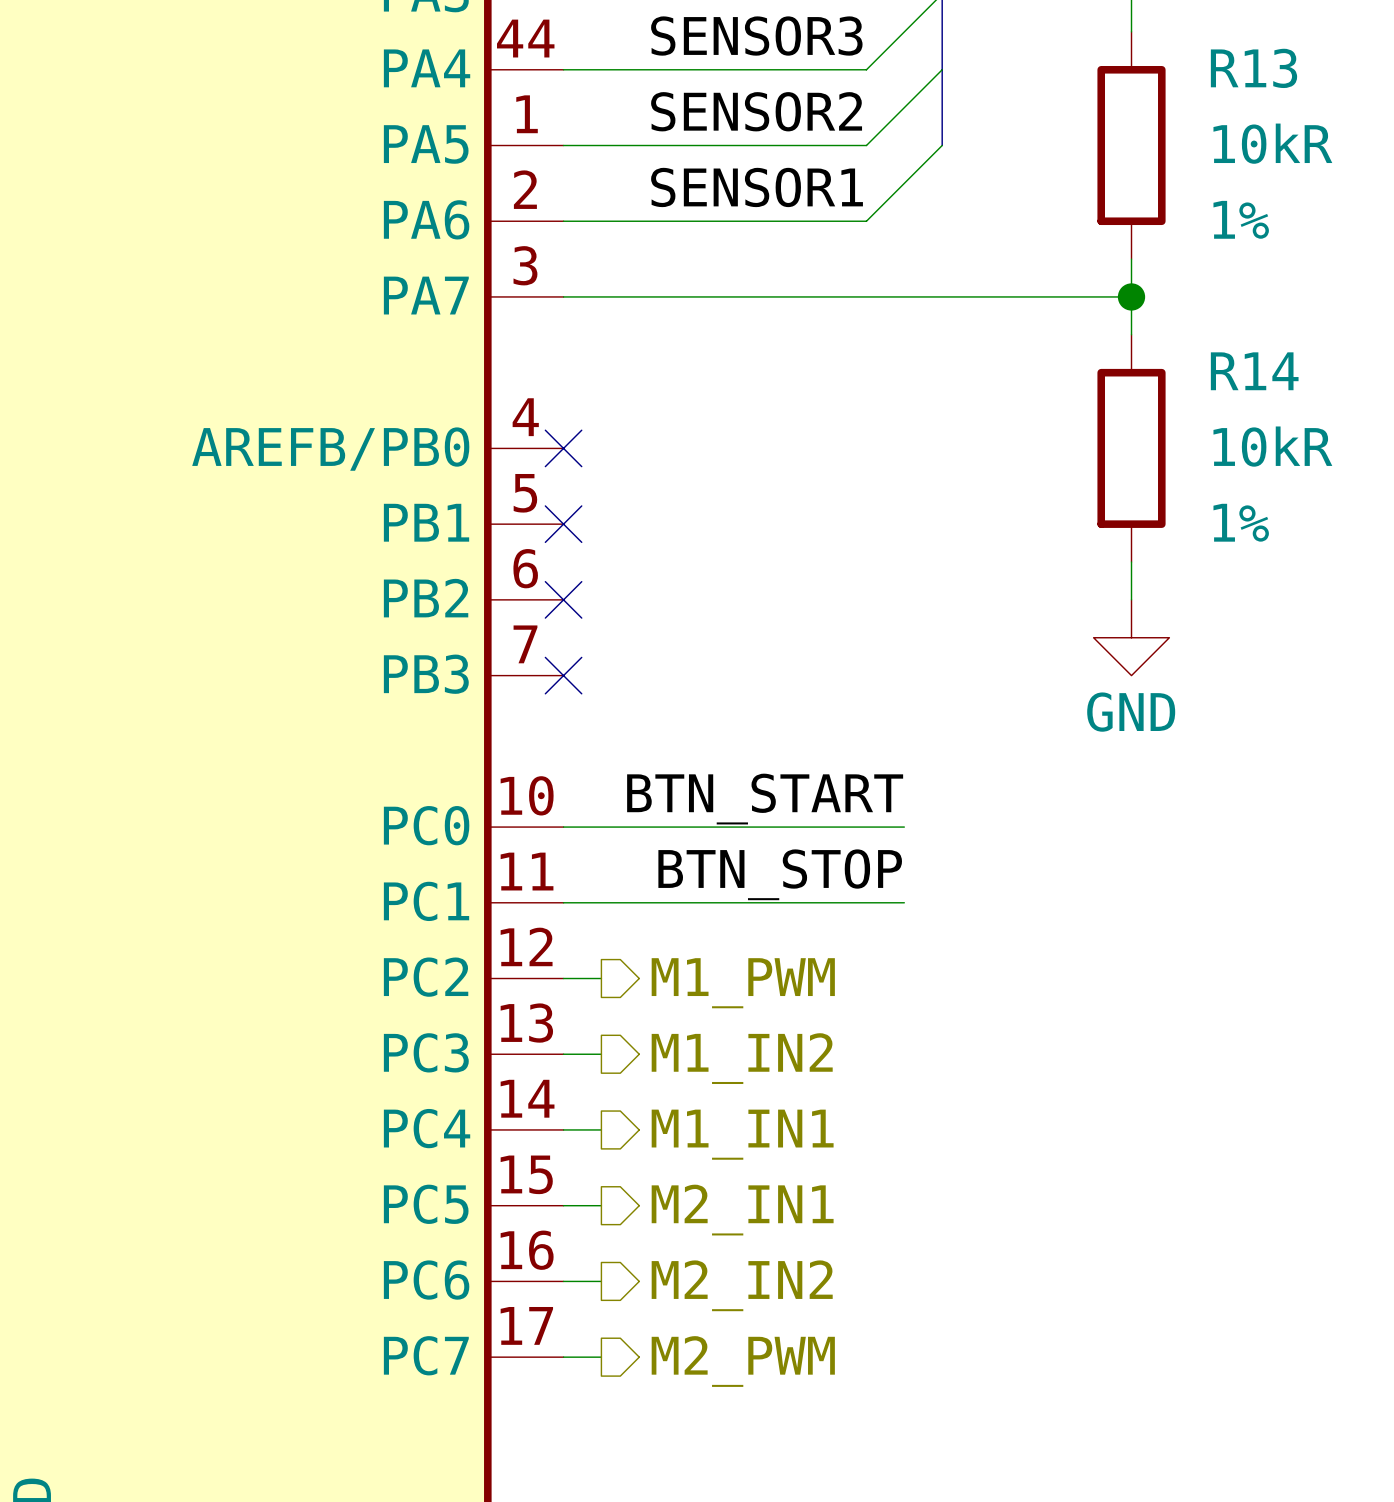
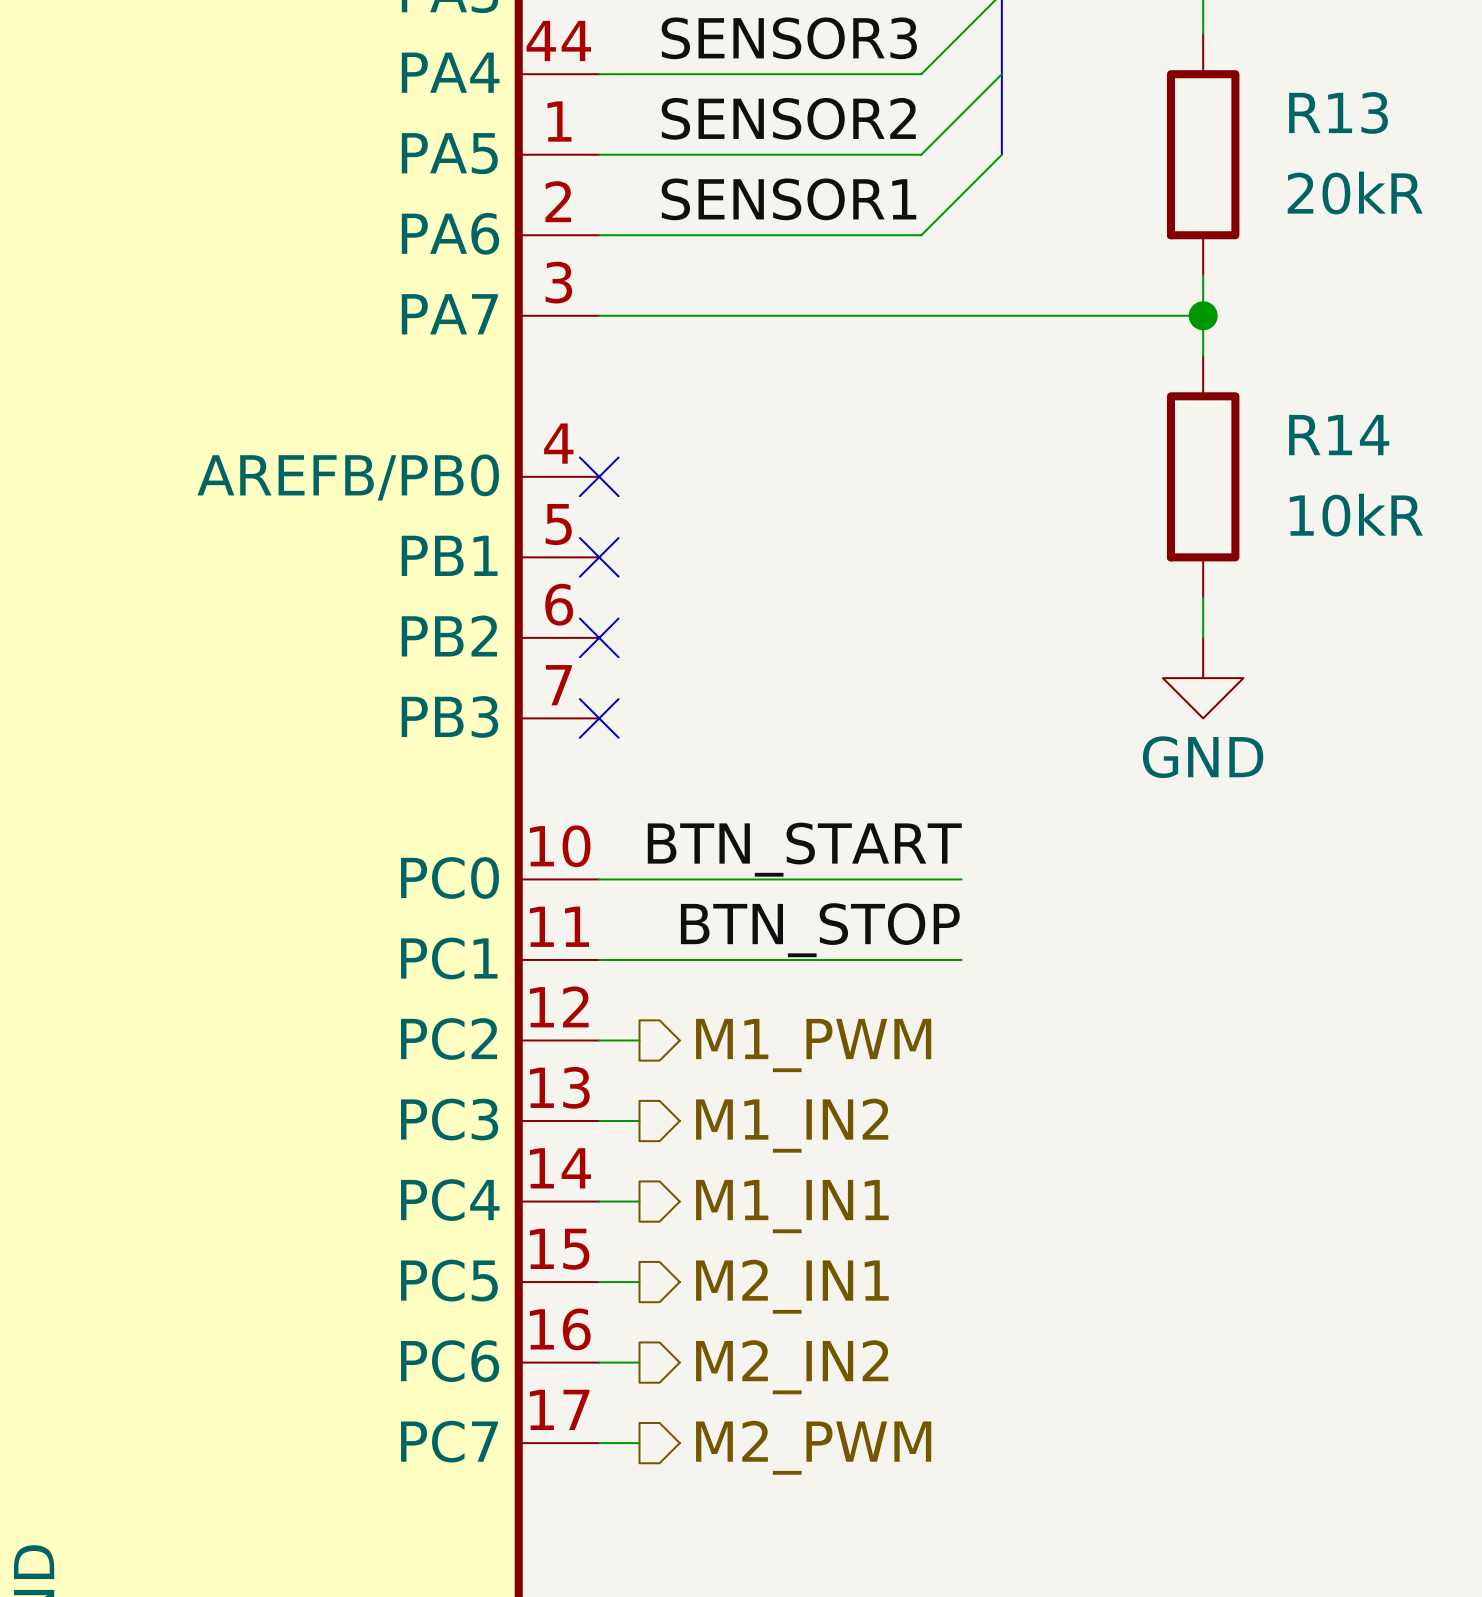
R13 name position: R13 (1253, 68) -> R13 (1338, 112)
R13 value: 10kR (1272, 143) -> 20kR (1355, 193)
R13 text: 1% (1241, 219) -> none
R14 name position: R14 (1254, 371) -> R14 (1339, 435)
R14 value position: 10kR (1272, 446) -> 10kR (1356, 515)
R14 text: 1% (1241, 522) -> none

